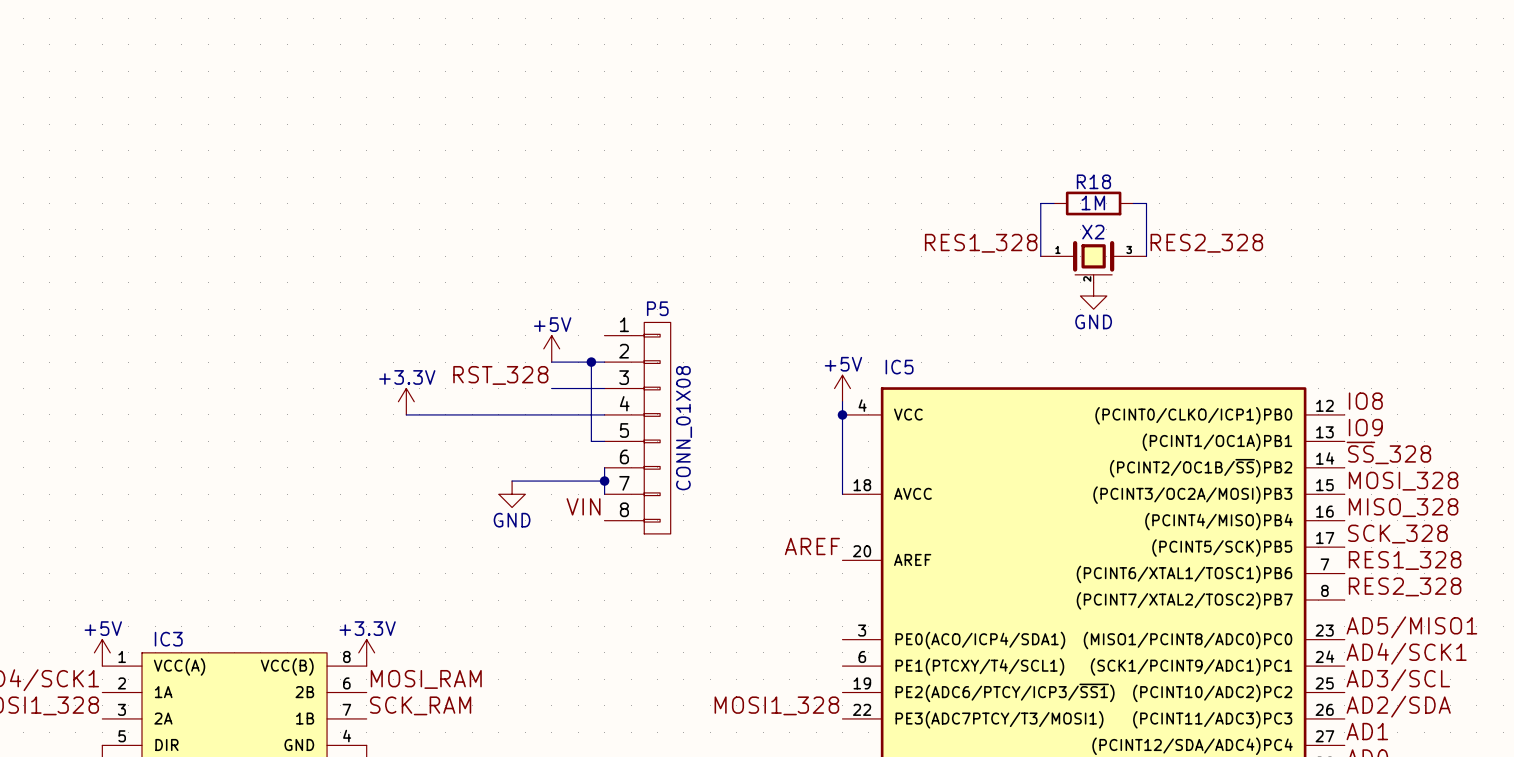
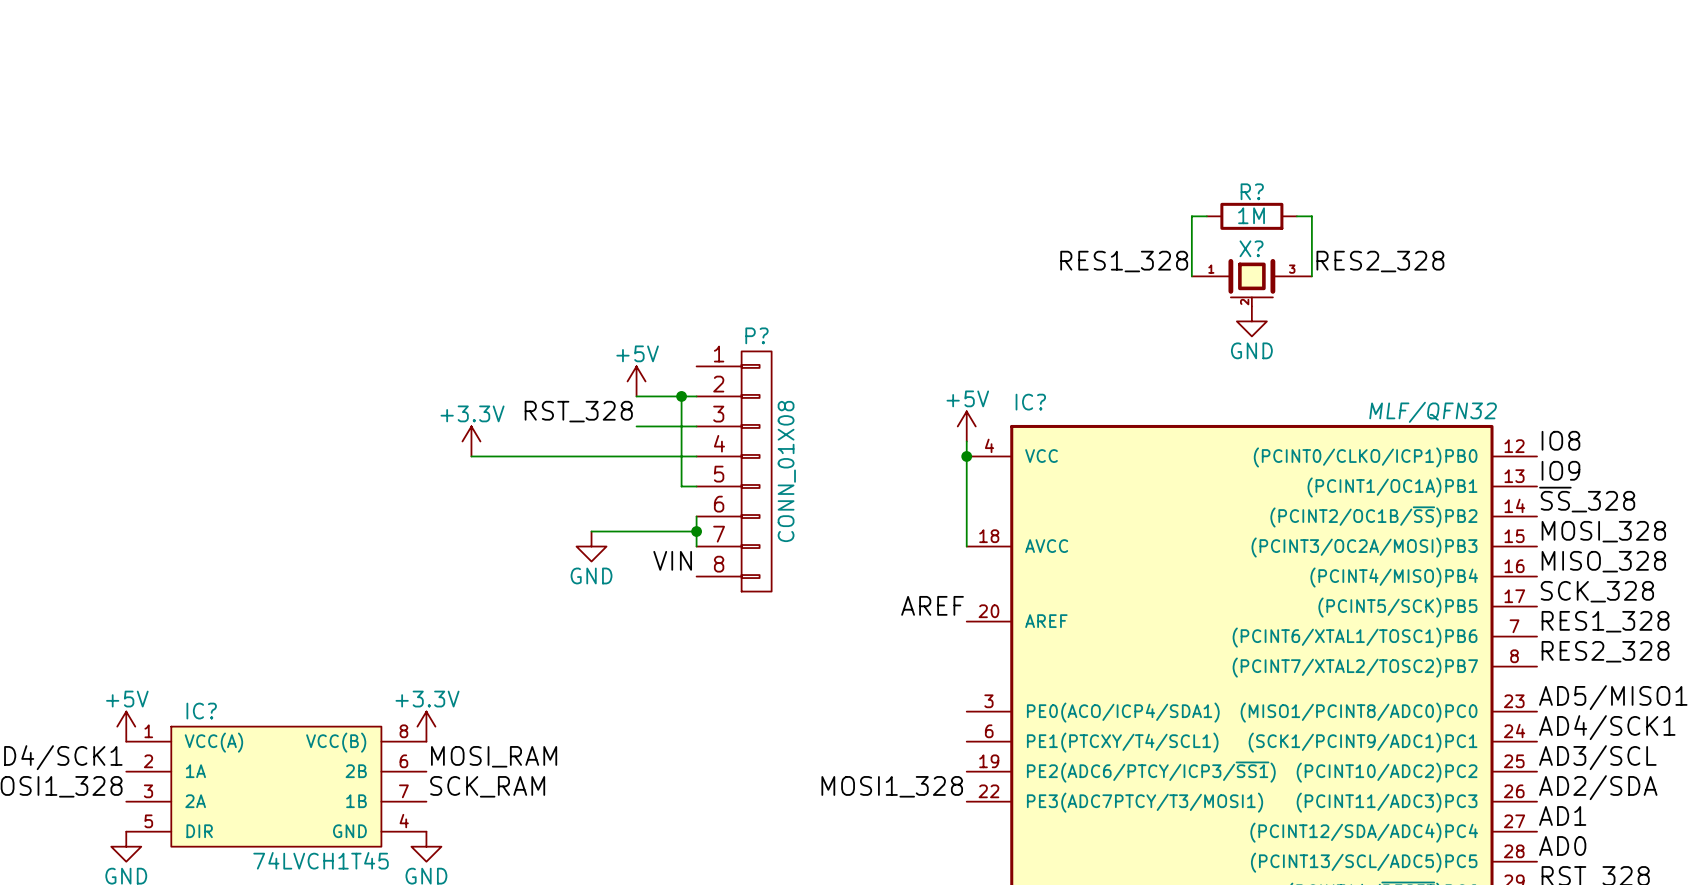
R18 name: R18 (1093, 181) -> R? (1252, 191)
X2 name: X2 (1093, 232) -> X? (1251, 248)
P5 name: P5 (657, 308) -> P? (756, 335)
IC5 name: IC5 (899, 367) -> IC? (1030, 402)
IC5 text: none -> MLF/QFN32 (1433, 412)
IC3 name: IC3 (168, 639) -> IC? (201, 711)

